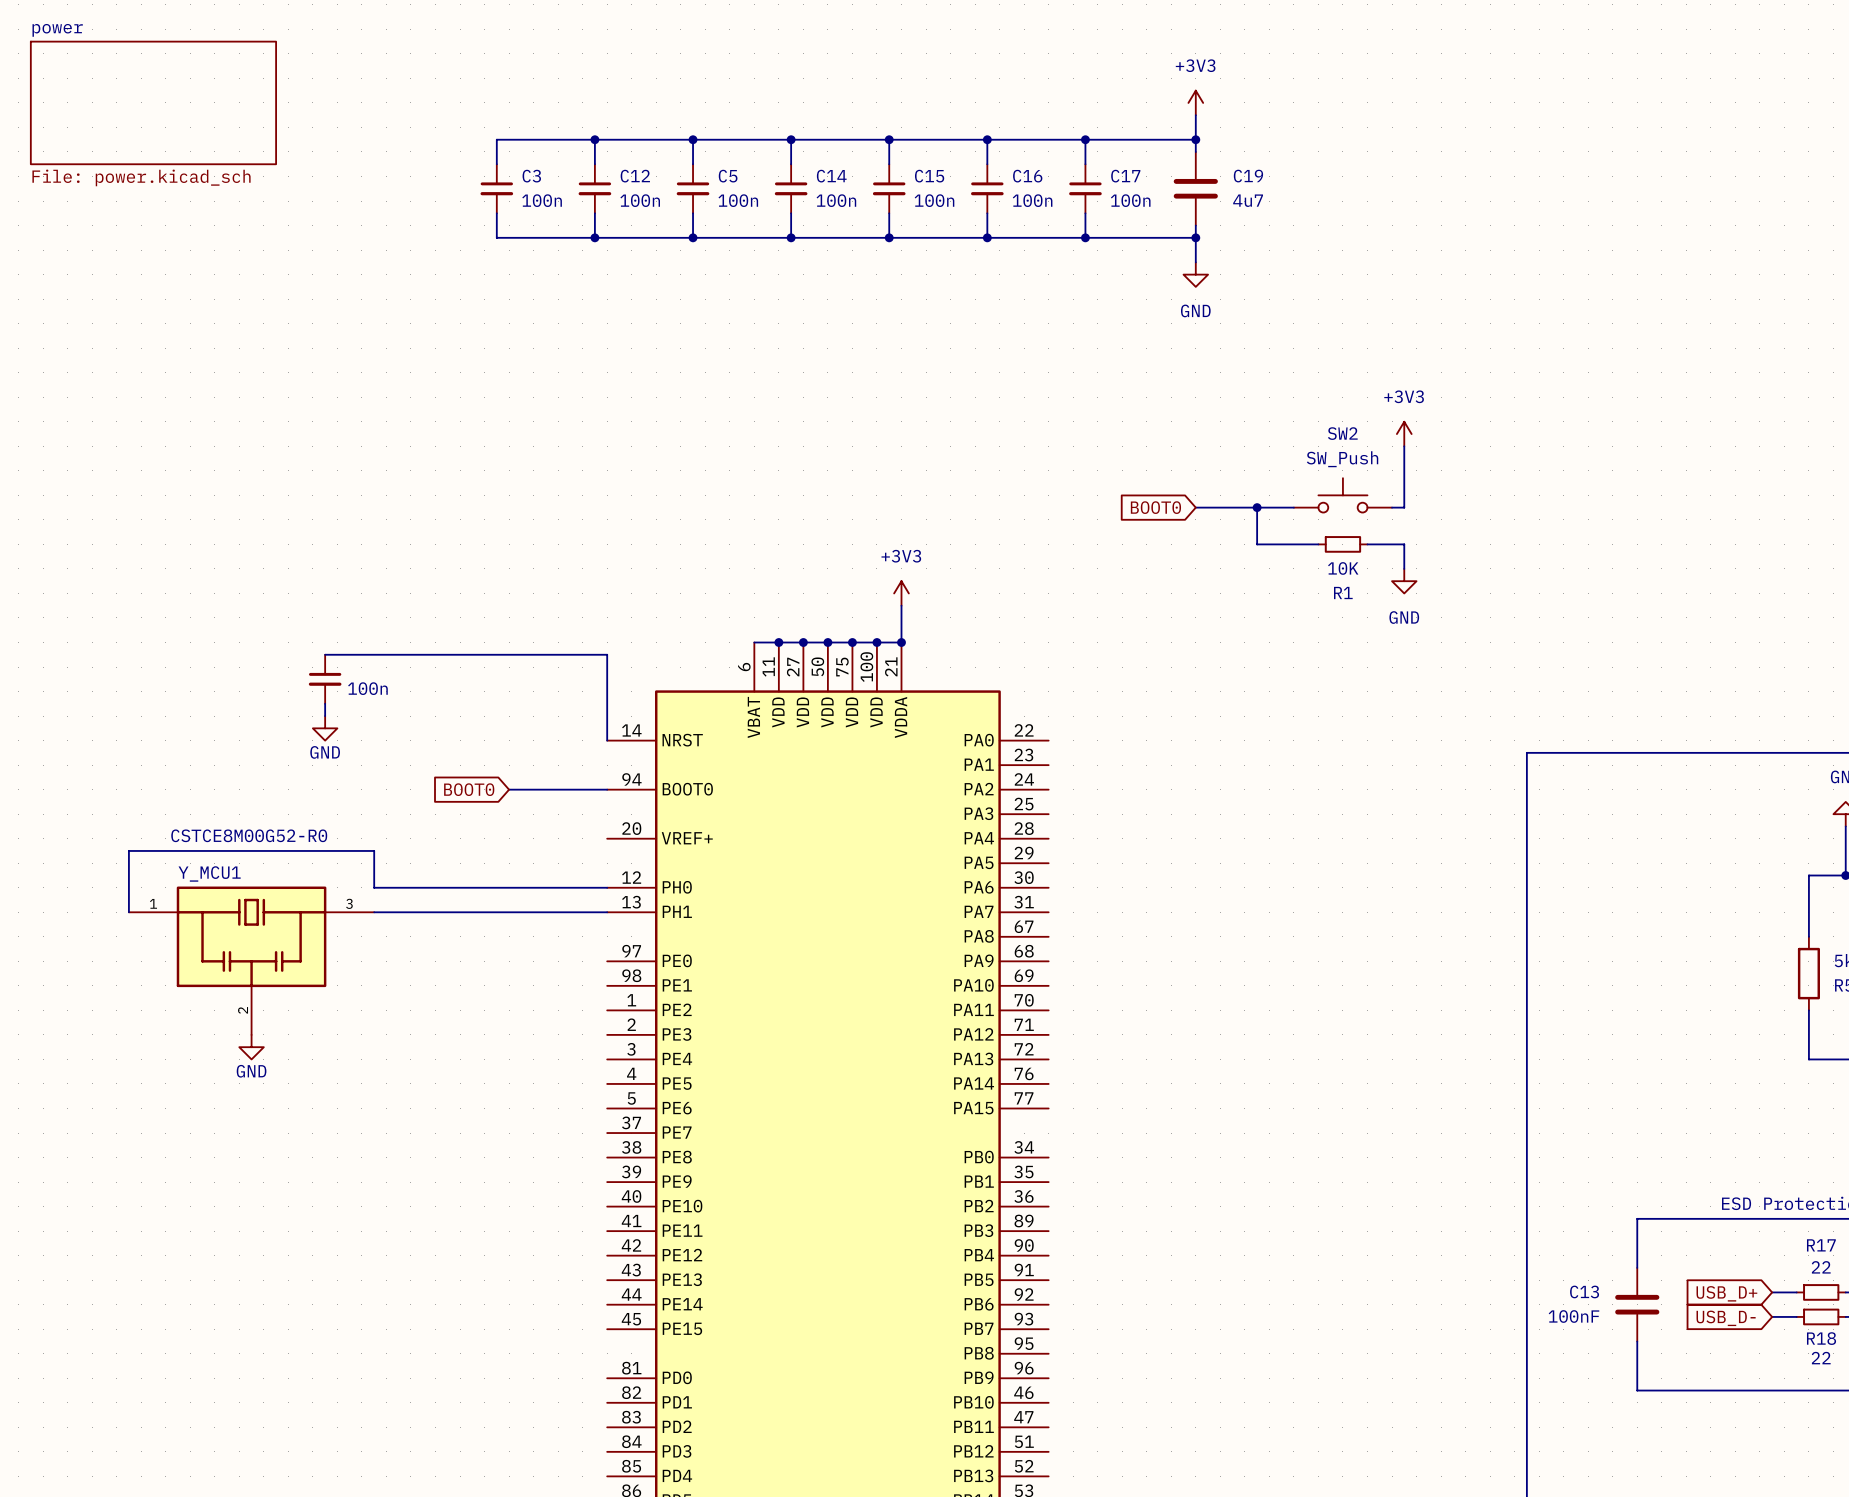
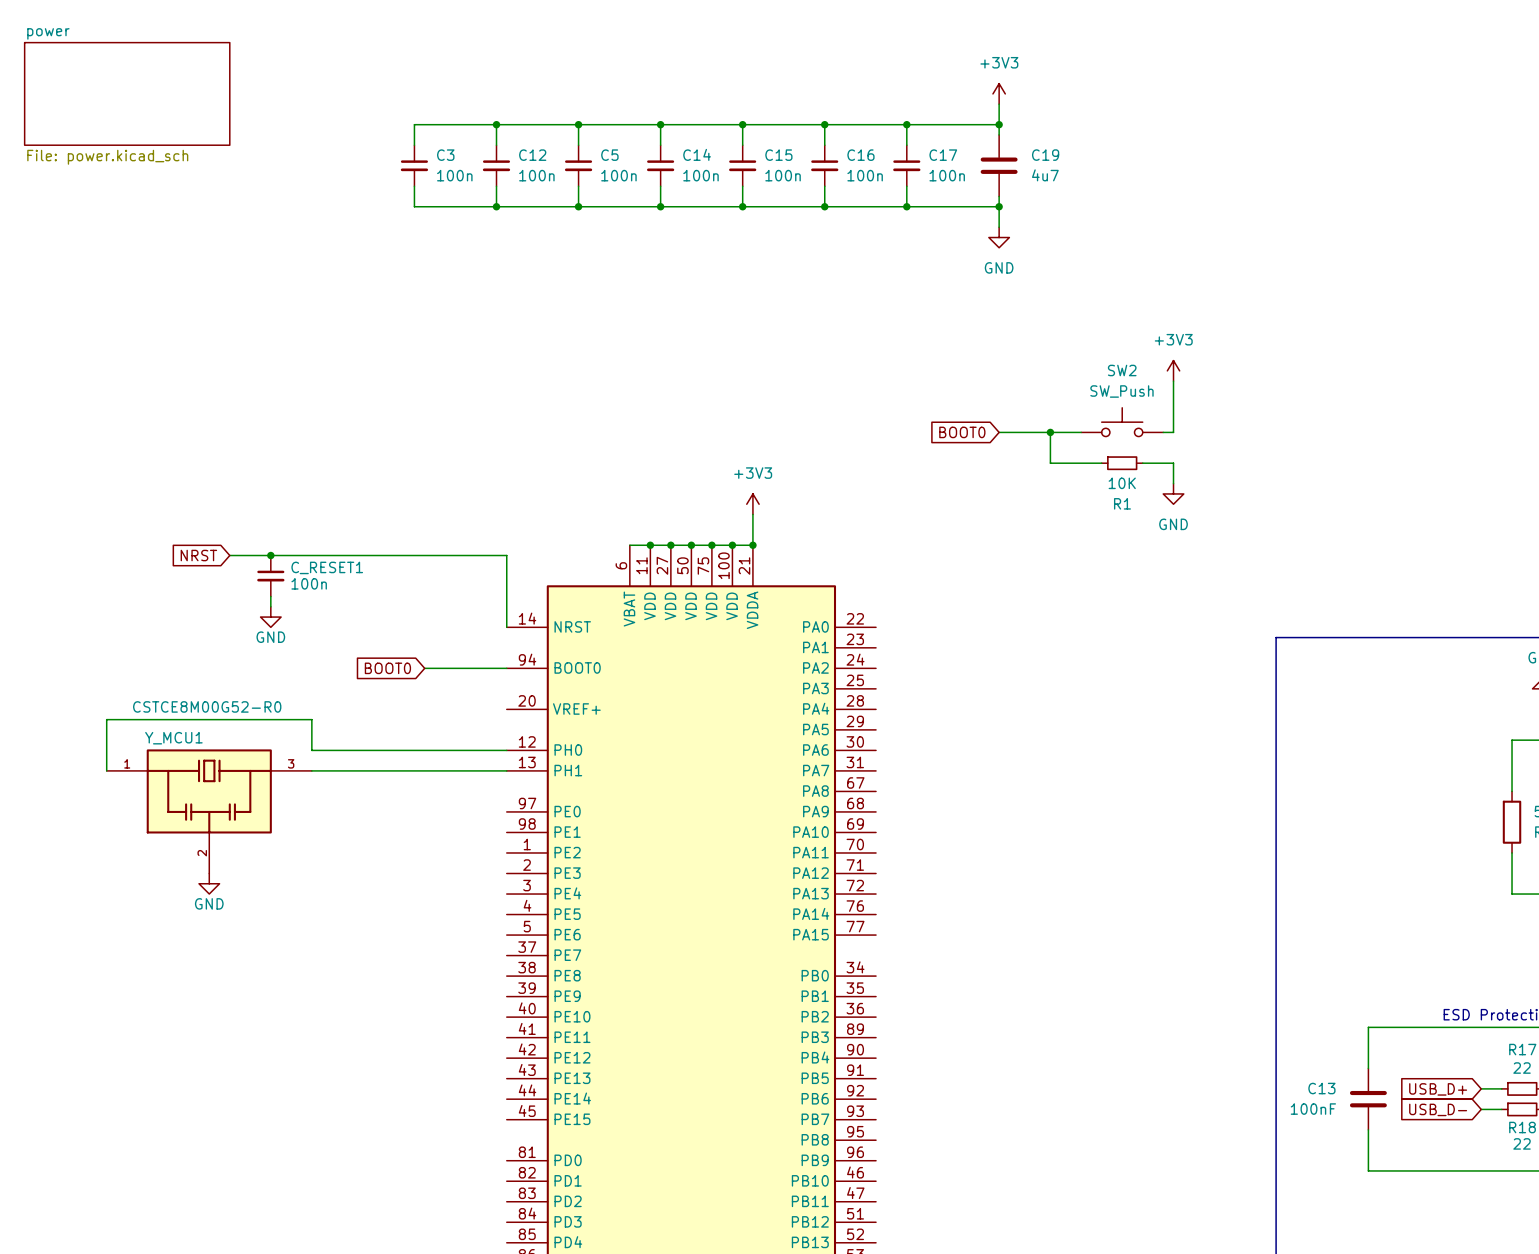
global label: none -> NRST (198, 555)
wire: none -> (229, 555) (270, 555)
junction: none -> (270, 555)
C_RESET1 name: none -> C_RESET1 (327, 567)

